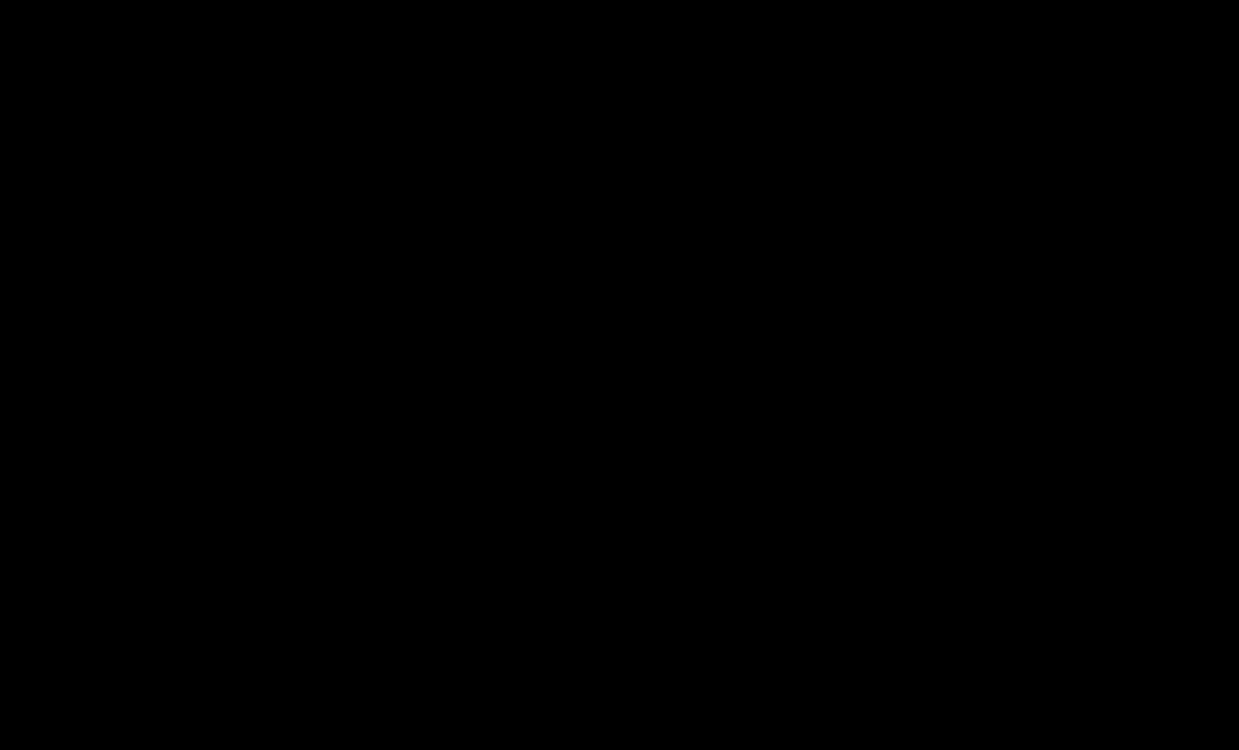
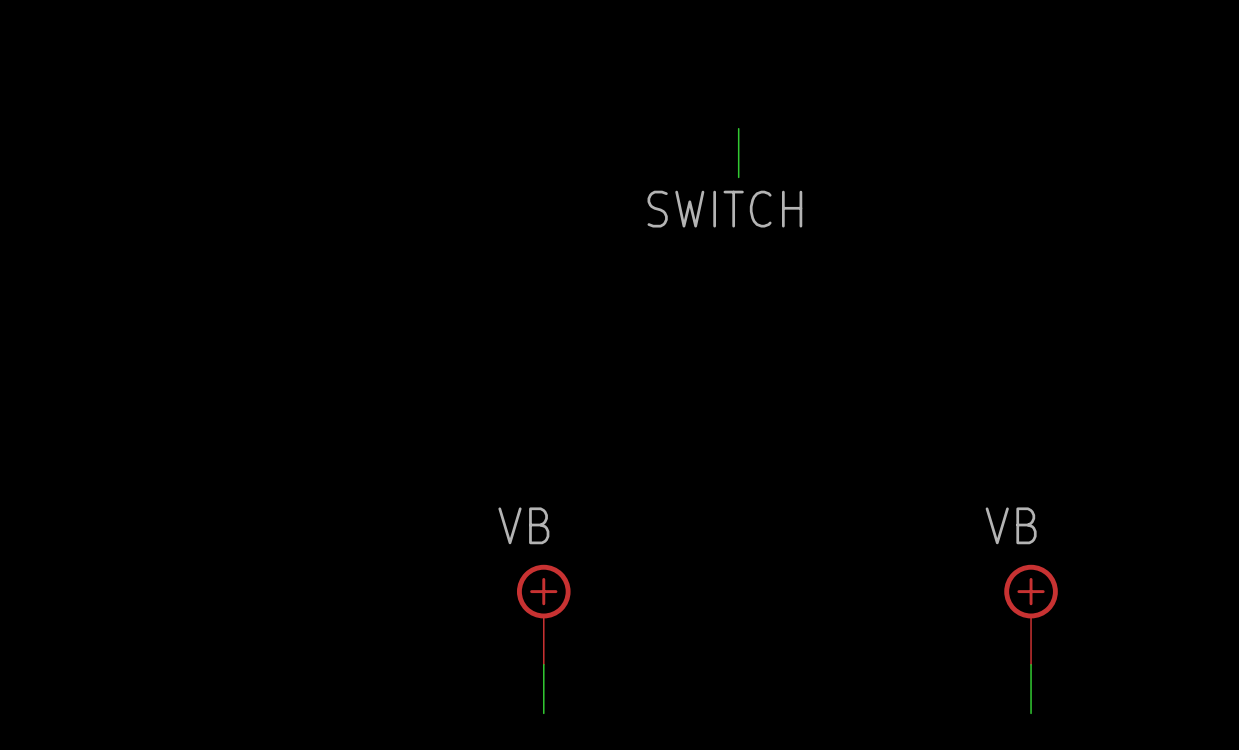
wire: none -> (738, 128) (738, 177)
label: none -> SWITCH (724, 209)
power symbol: none -> VB (543, 614)
power symbol: none -> VB (1031, 614)
wire: none -> (543, 664) (543, 713)
wire: none -> (1031, 664) (1031, 713)

